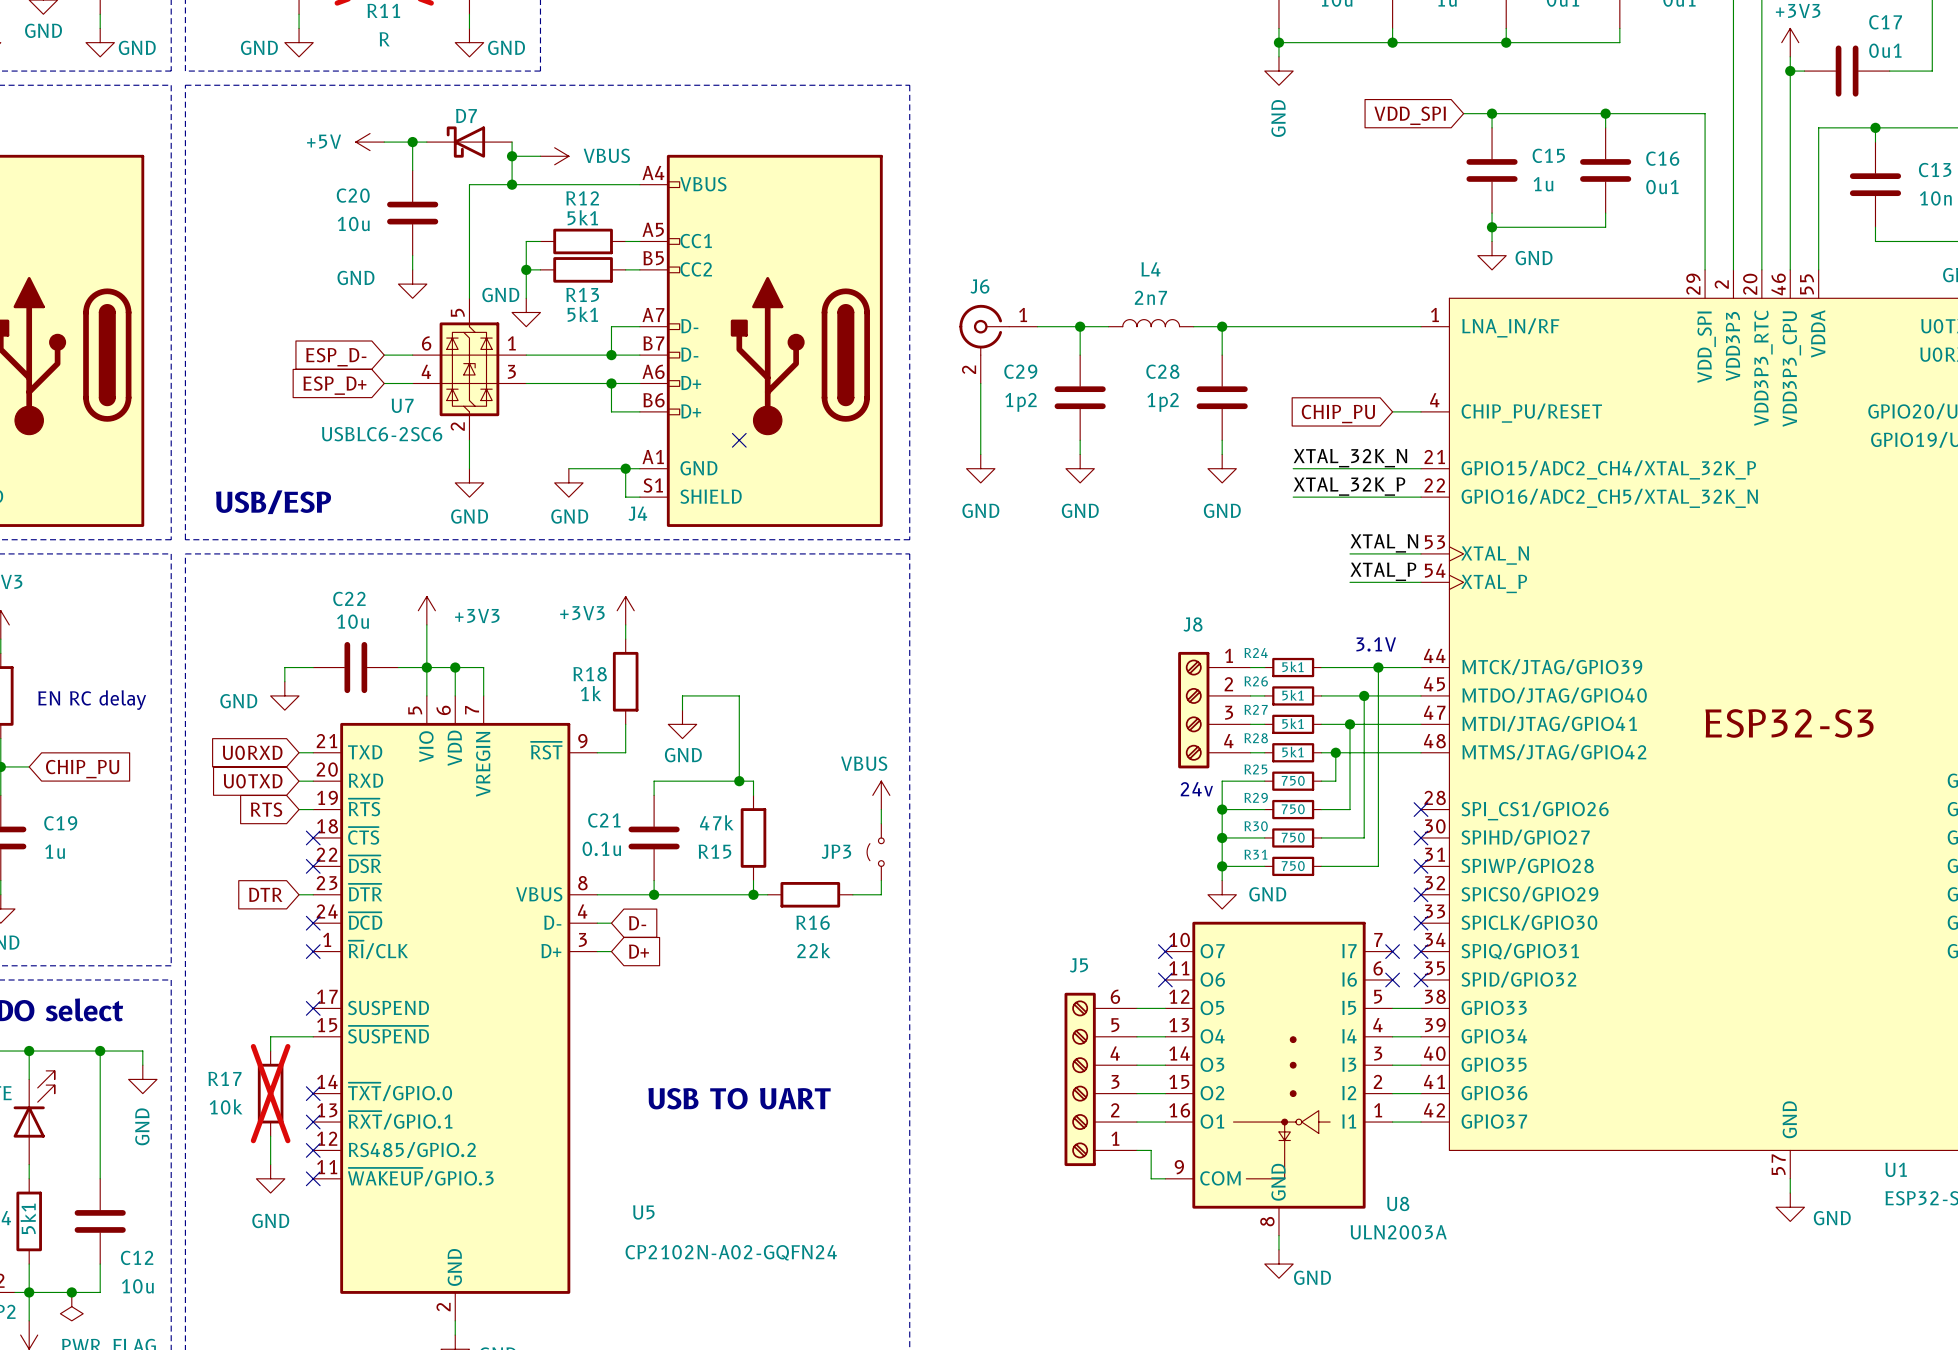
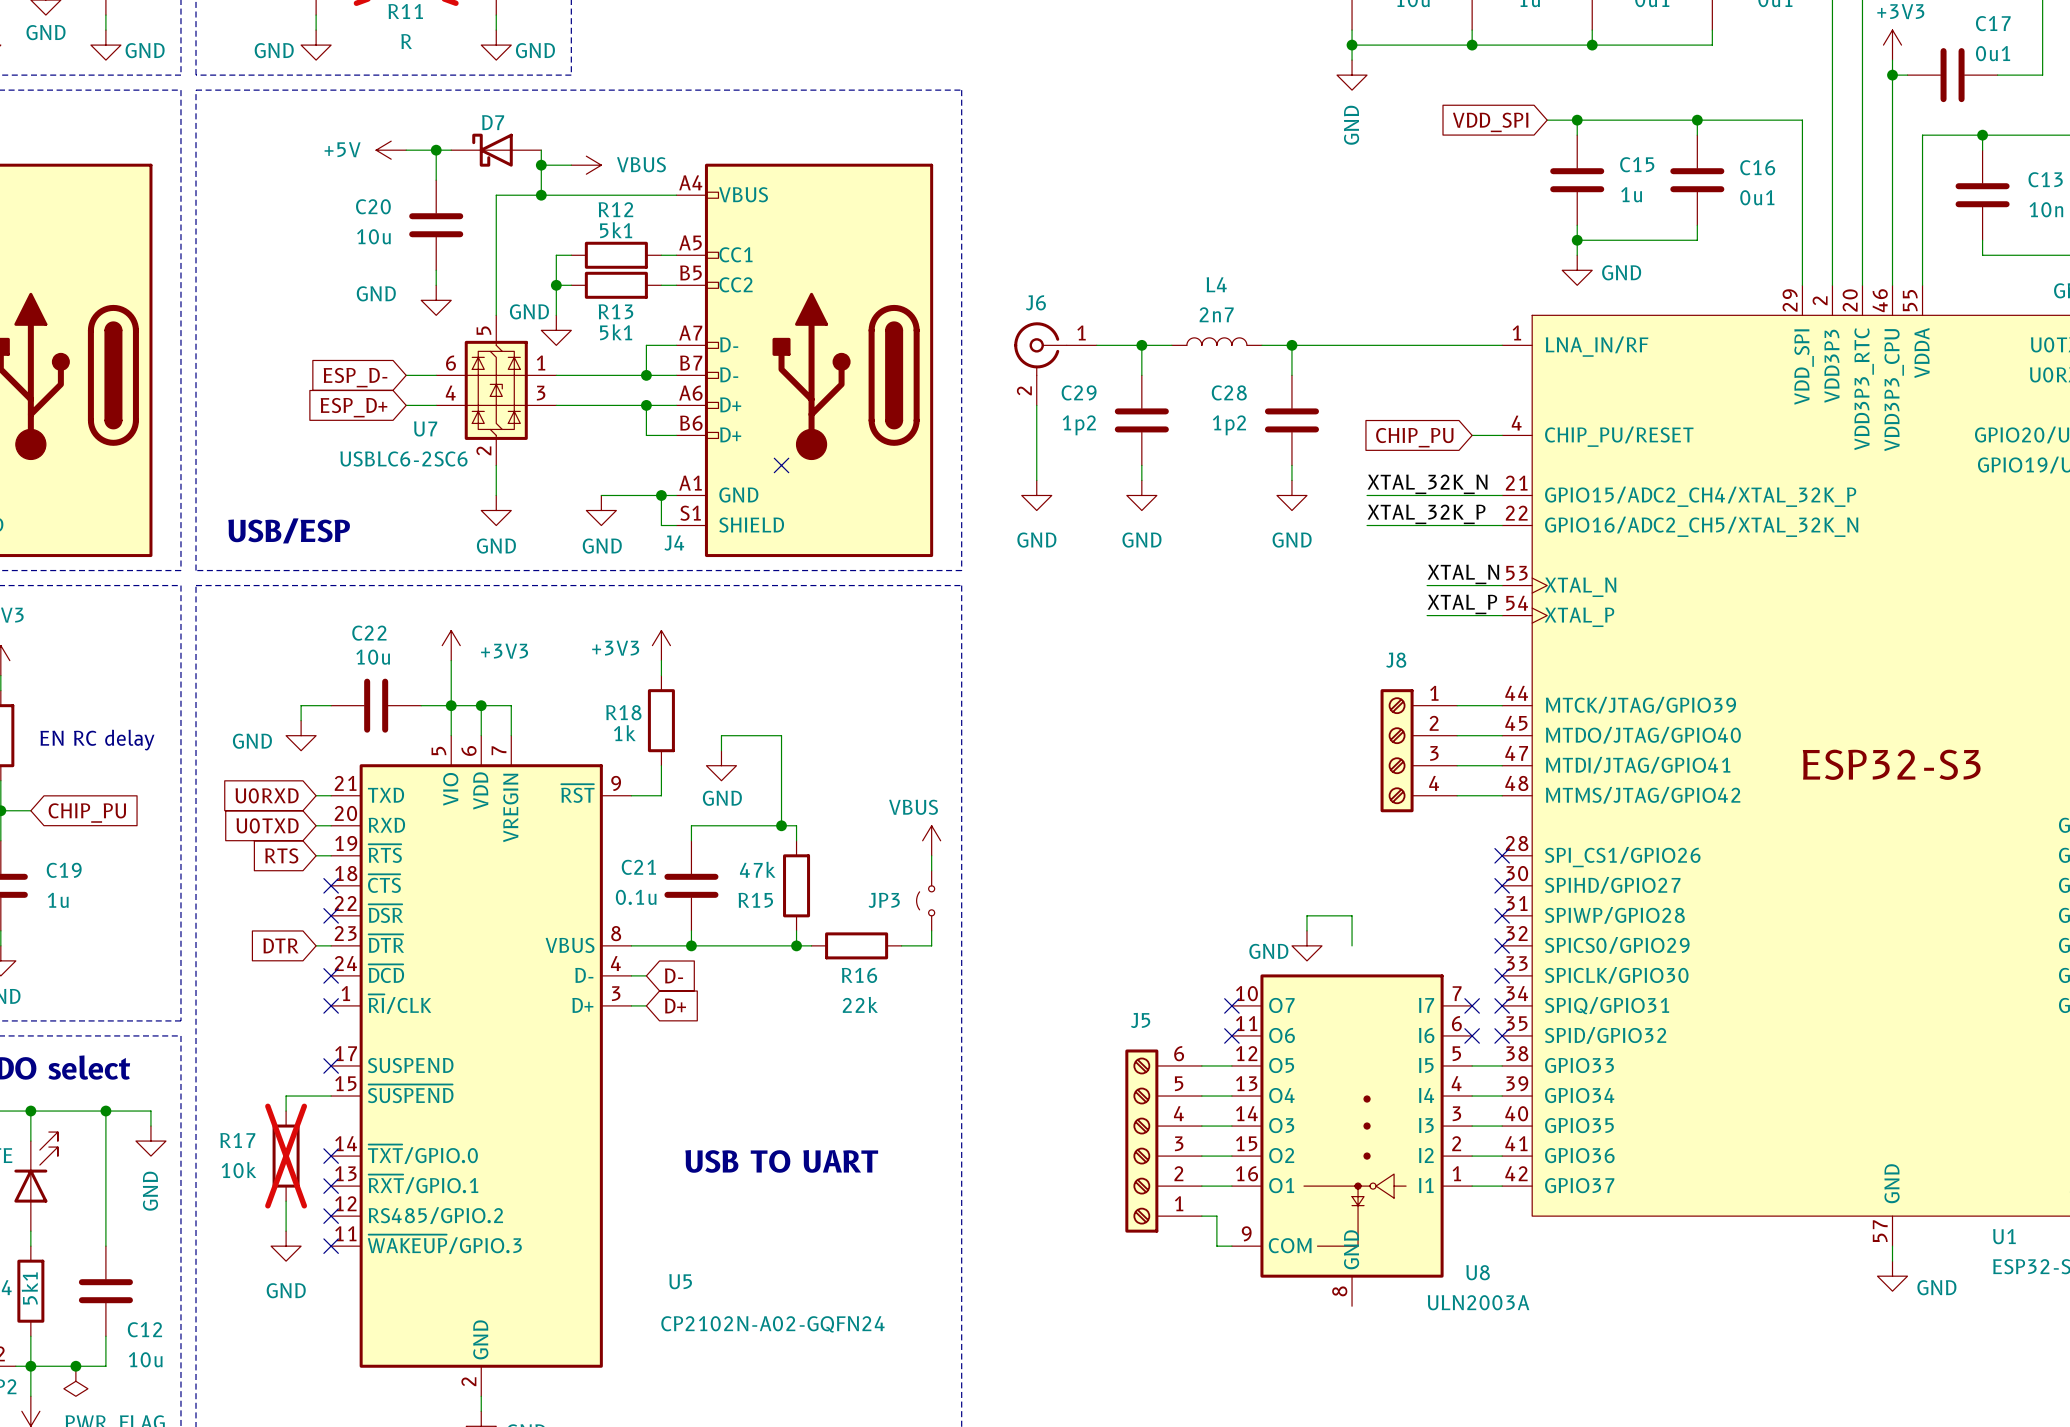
text: 3.1V (1376, 644) -> none
wire: (1250, 667) (1264, 667) -> none
R24: 5k1 (1293, 667) -> none
wire: (1321, 667) (1378, 667) (1378, 866) (1321, 866) -> none
junction: (1378, 667) -> none
wire: (1250, 695) (1264, 695) -> none
R26: 5k1 (1293, 695) -> none
wire: (1364, 695) (1364, 837) (1321, 837) -> none
junction: (1364, 695) -> none
J8 position: (1214, 710) -> (1418, 750)
wire: (1250, 724) (1264, 724) -> none
R27: 5k1 (1293, 724) -> none
wire: (1350, 724) (1350, 809) (1321, 809) -> none
junction: (1350, 724) -> none
wire: (1250, 752) (1264, 752) -> none
R28: 5k1 (1293, 752) -> none
wire: (1335, 752) (1335, 781) (1321, 781) -> none
junction: (1335, 752) -> none
wire: (1264, 781) (1222, 781) (1222, 880) -> none
R25: 750 (1293, 781) -> none
text: 24v (1196, 789) -> none
wire: (1222, 809) (1264, 809) -> none
junction: (1222, 809) -> none
R29: 750 (1293, 809) -> none
wire: (1222, 837) (1264, 837) -> none
junction: (1222, 837) -> none
R30: 750 (1293, 837) -> none
wire: (1222, 866) (1236, 866) -> (1306, 930) (1306, 915)
junction: (1222, 866) -> none
wire: none -> (1337, 915) (1352, 915) (1352, 945)
R31: 750 (1293, 866) -> none
power symbol position: GND (1222, 894) -> GND (1306, 945)
power symbol text position: GND (1267, 894) -> GND (1268, 951)
wire: (1278, 1235) (1278, 1249) -> none
power symbol: GND (1278, 1264) -> none

